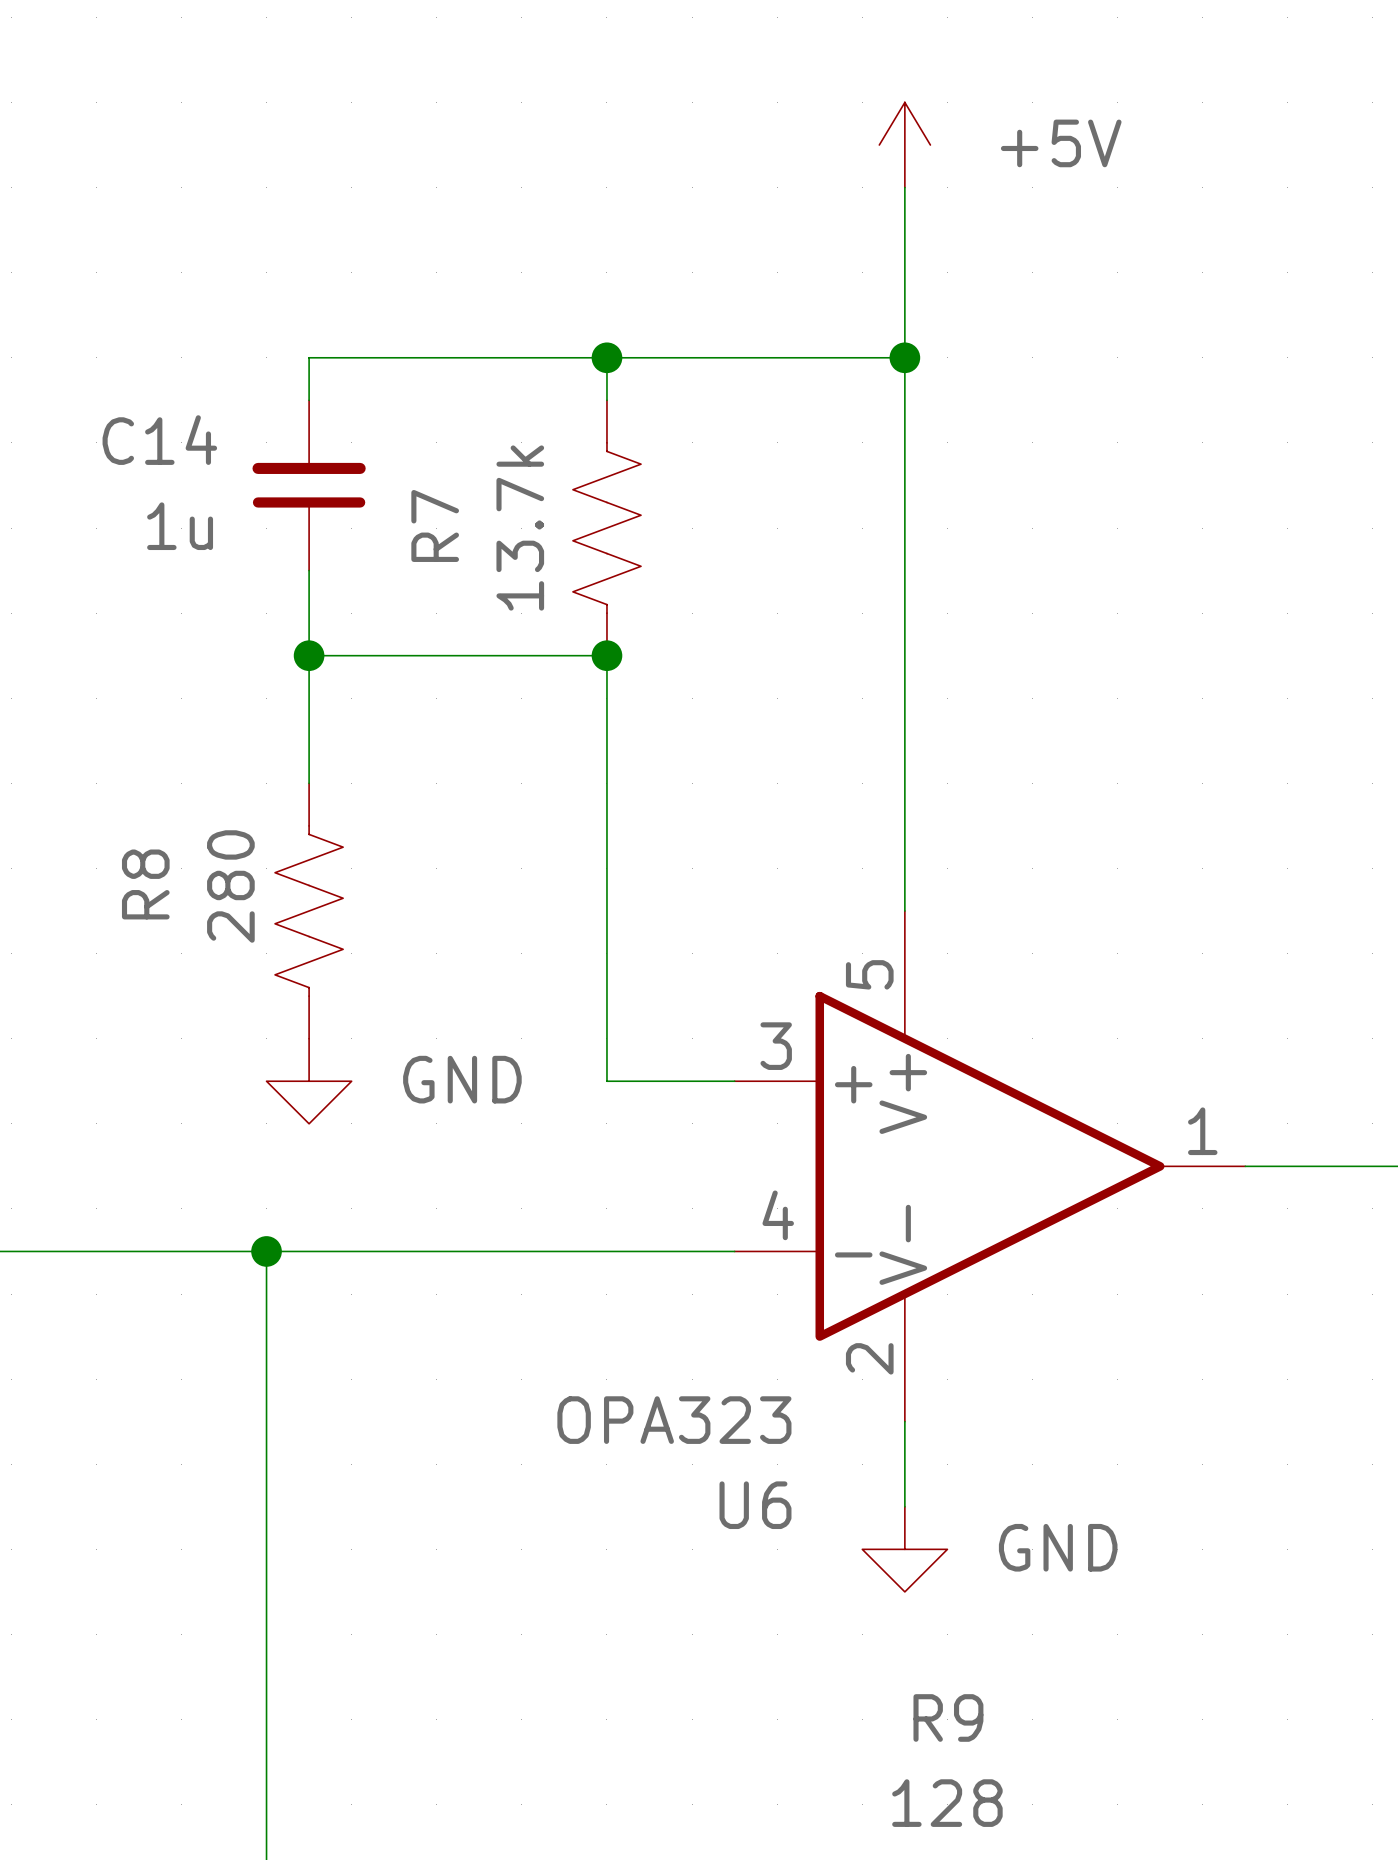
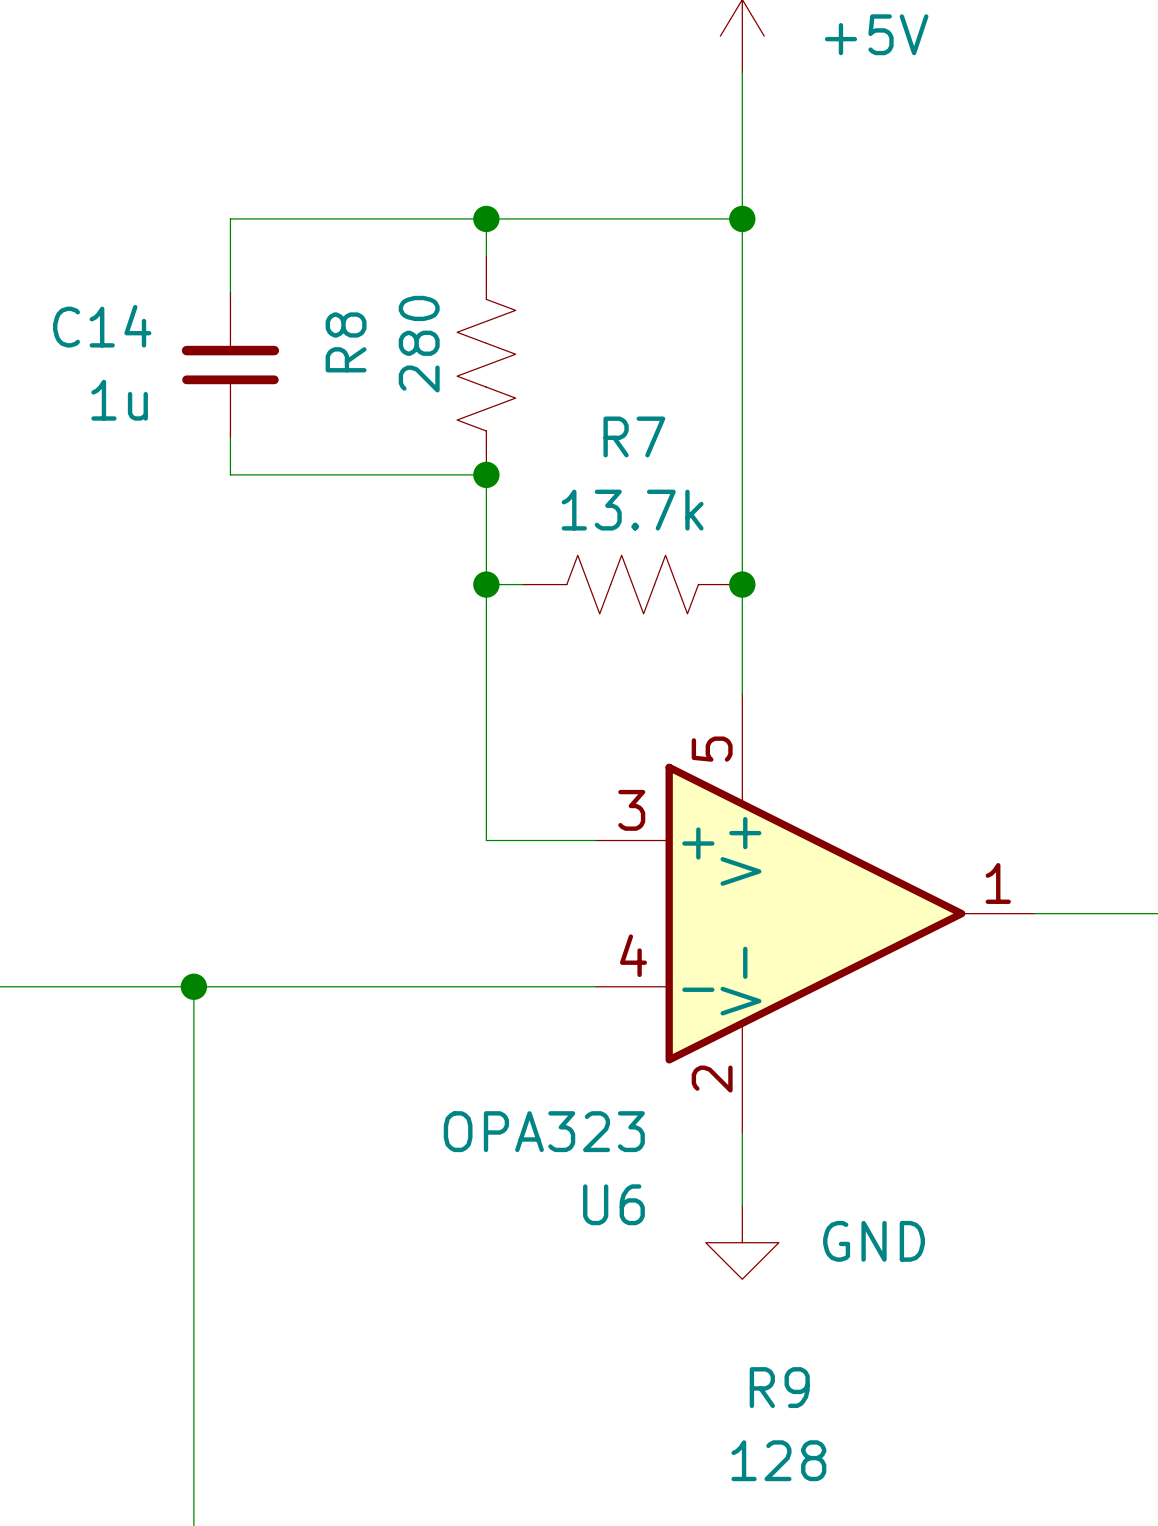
C14 position: (309, 485) -> (230, 365)
R7 name: R7 (435, 525) -> R8 (346, 342)
R7 value: 13.7k (520, 528) -> 280 (419, 344)
wire: (309, 655) (309, 783) -> none
junction: (309, 655) -> none
wire: none -> (486, 584) (522, 584)
junction: none -> (486, 584)
R7: none -> 13.7k (632, 584)
junction: none -> (742, 584)
R8: 280 (309, 911) -> none
power symbol: GND (309, 1081) -> none

